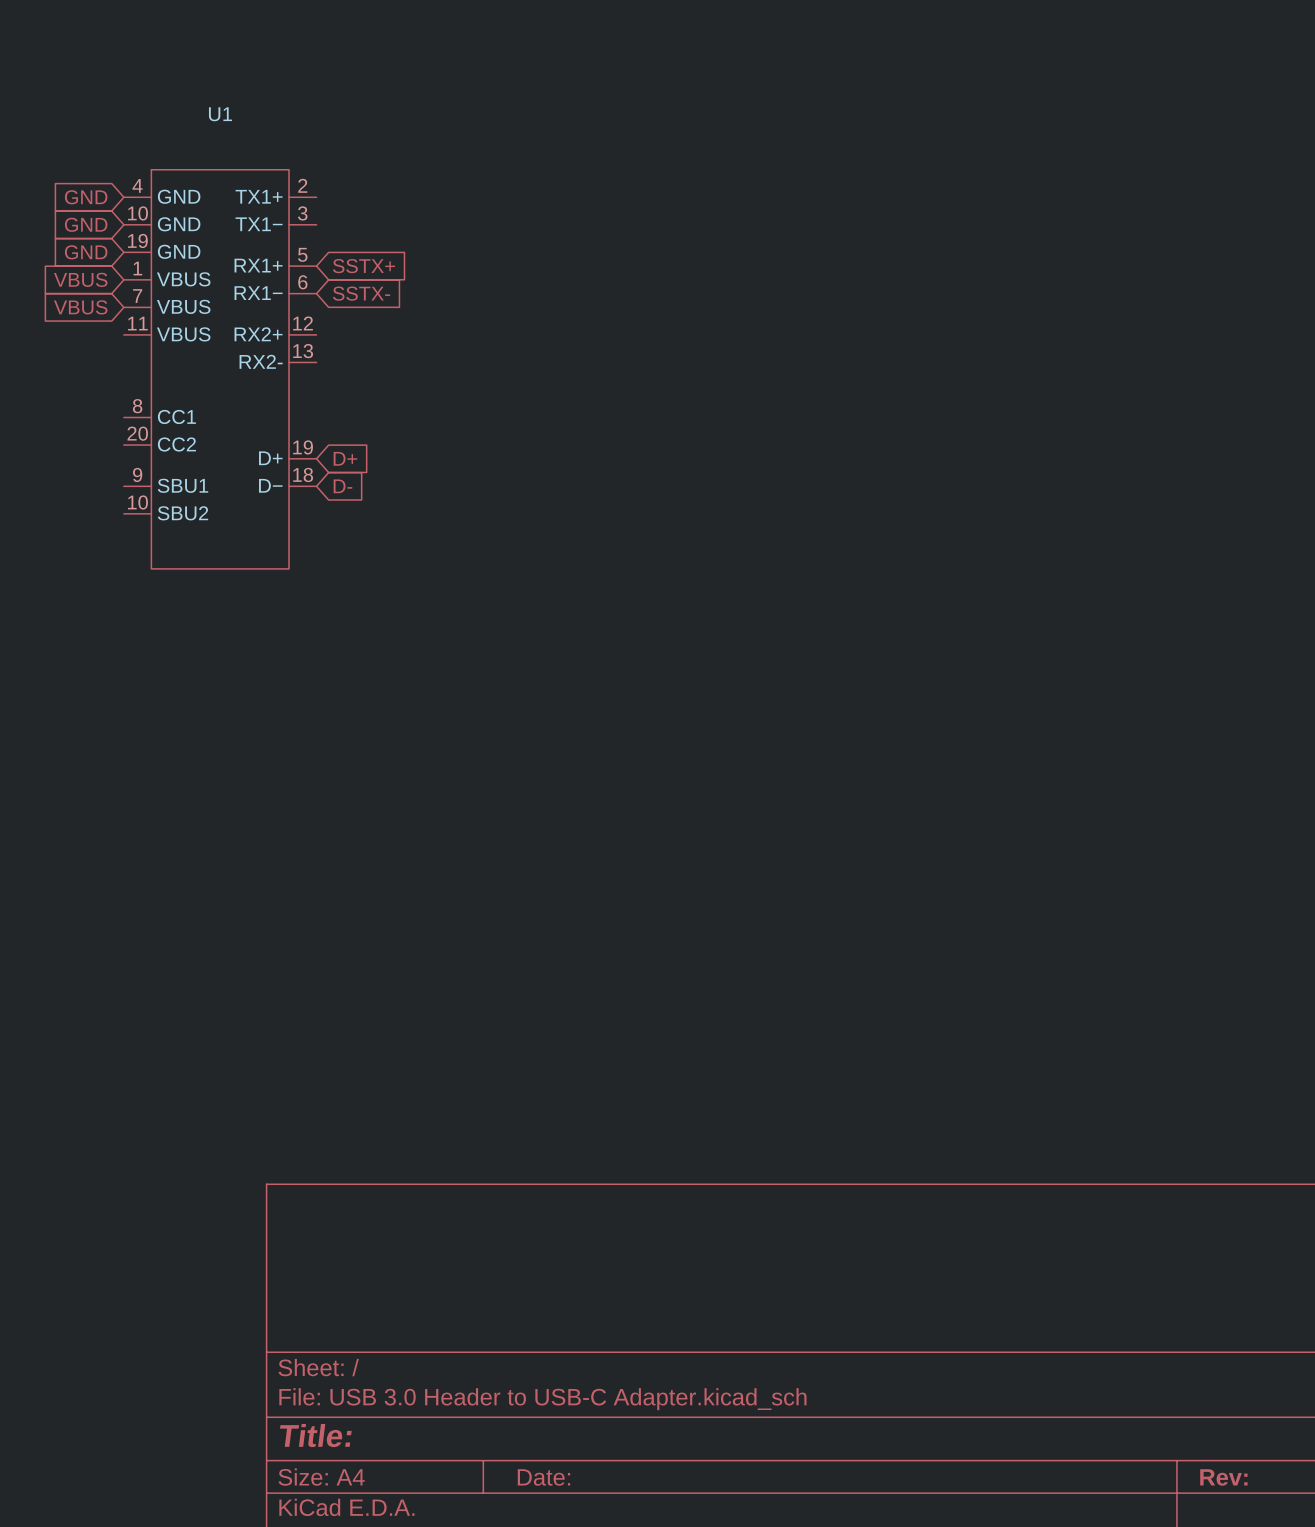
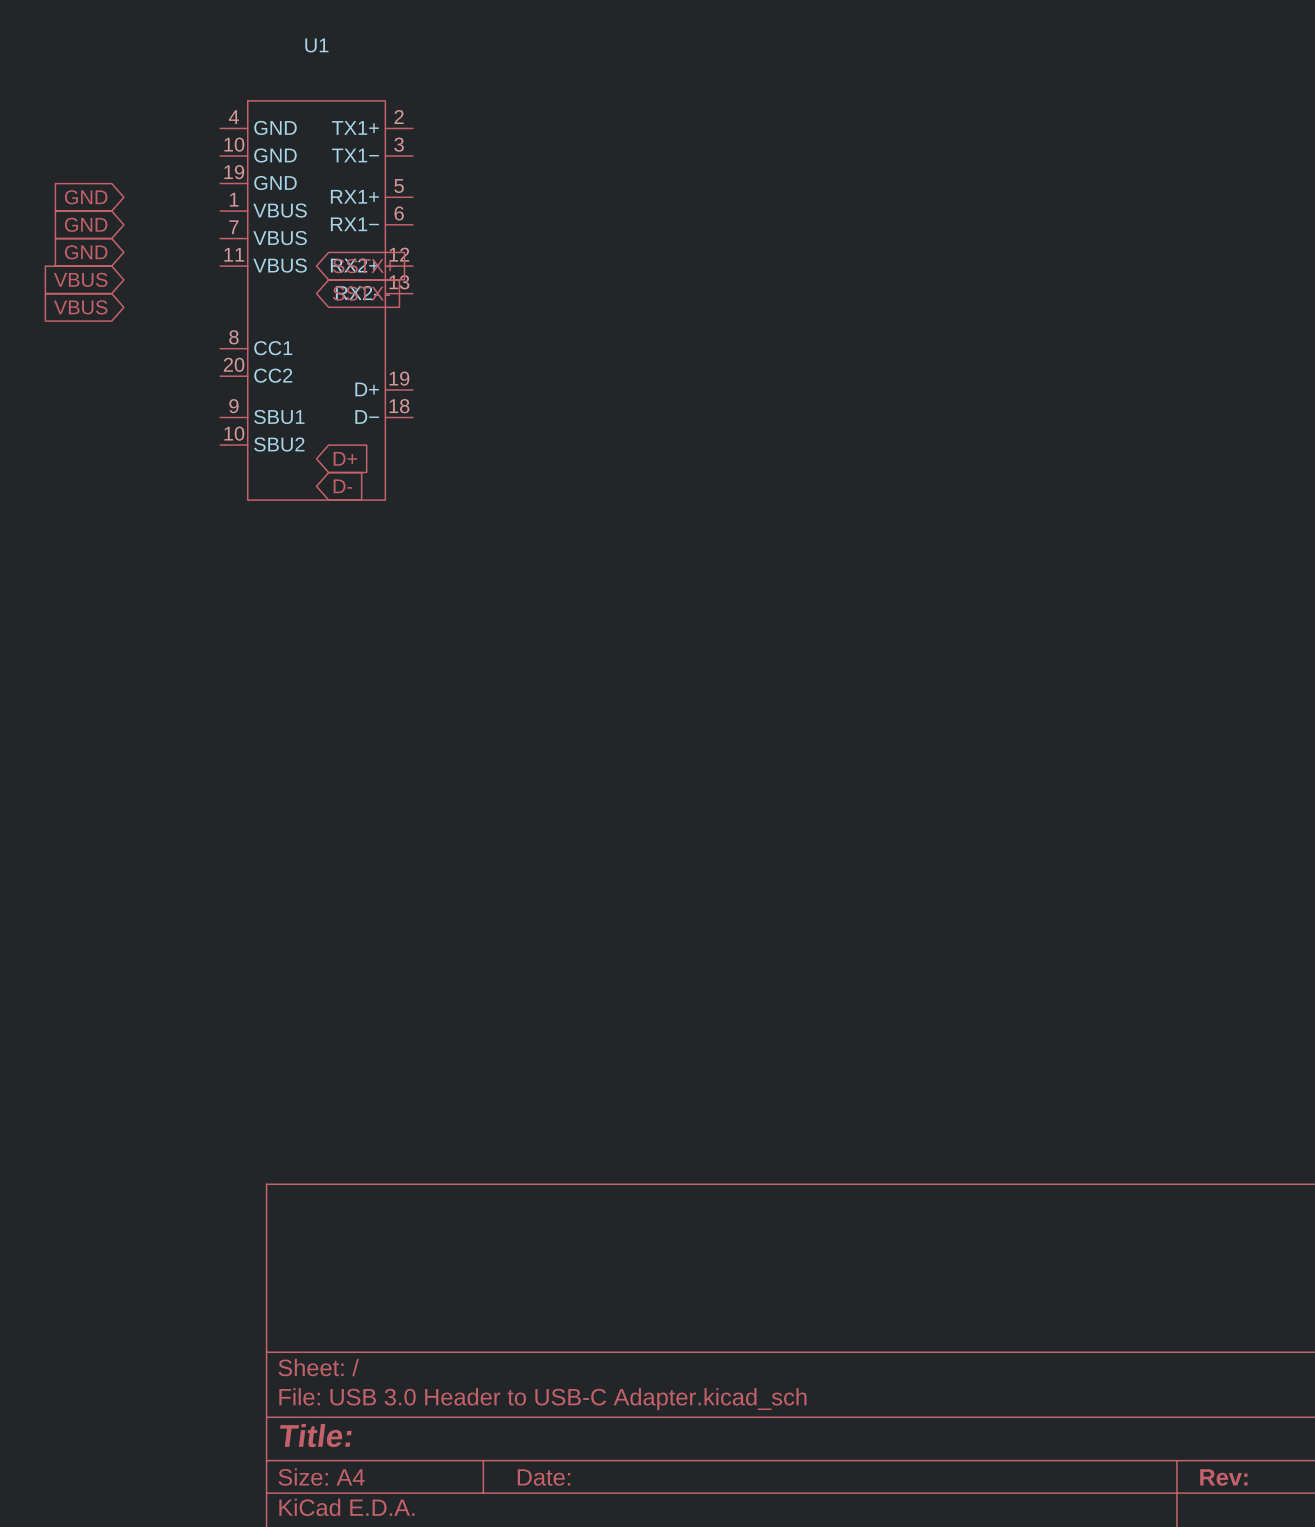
U1 position: (220, 369) -> (316, 300)

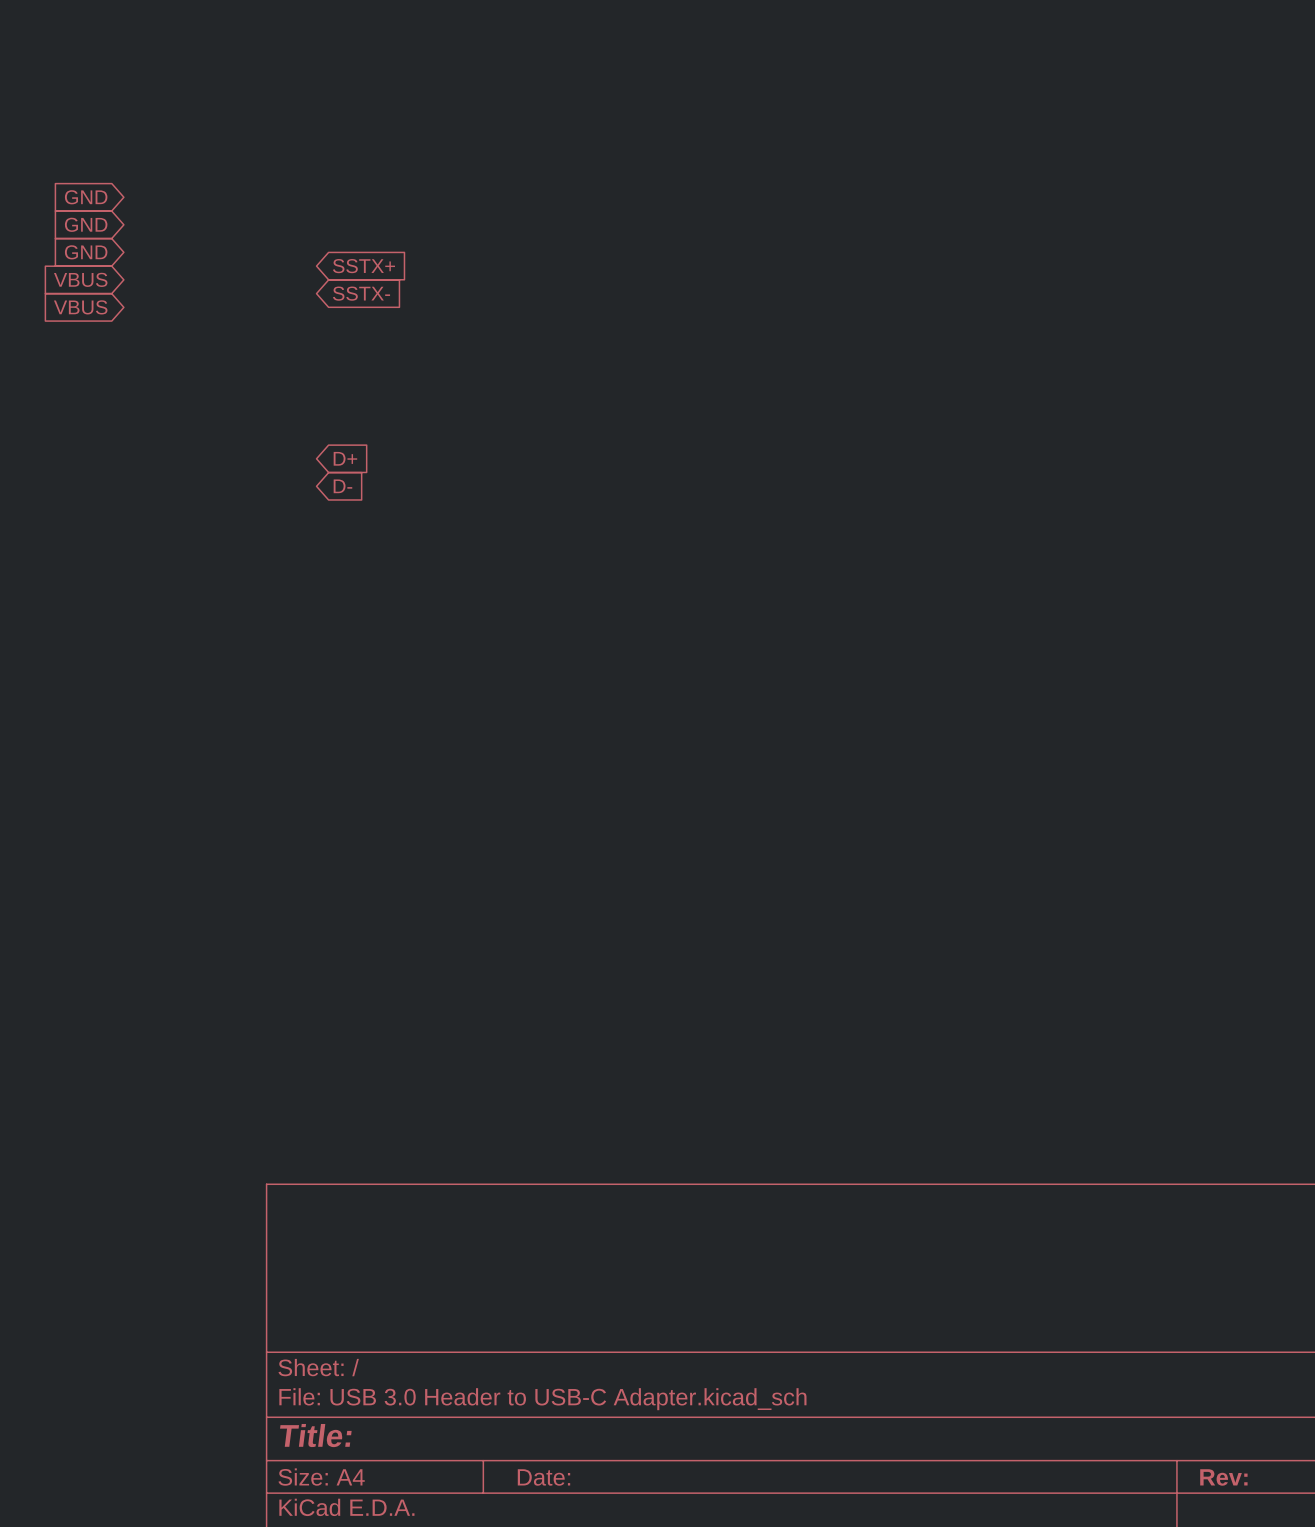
U1: (316, 300) -> none

